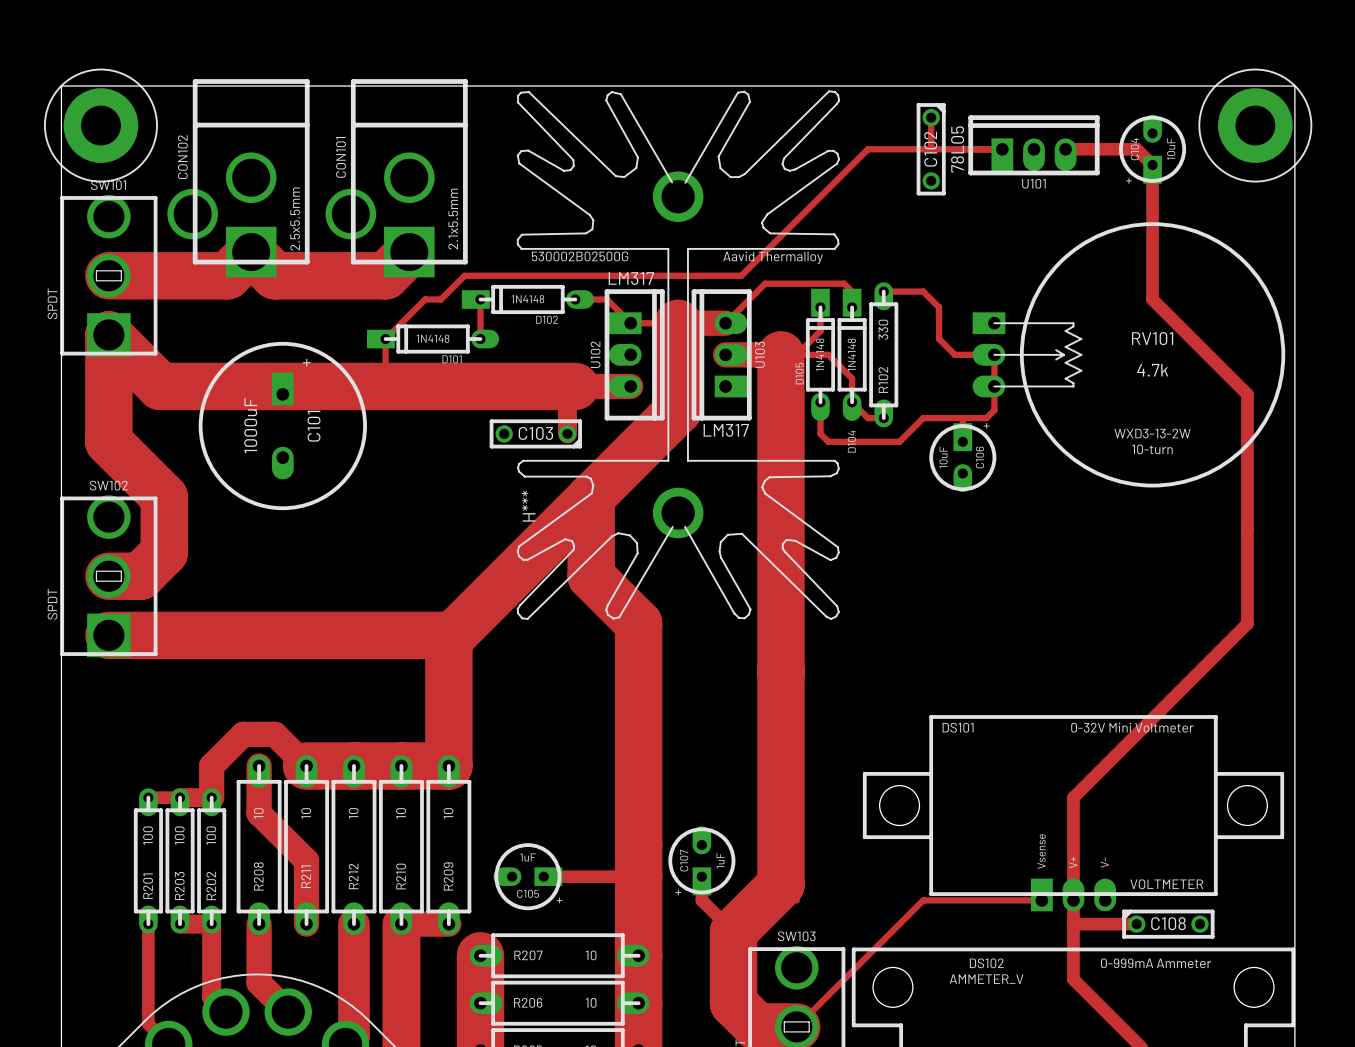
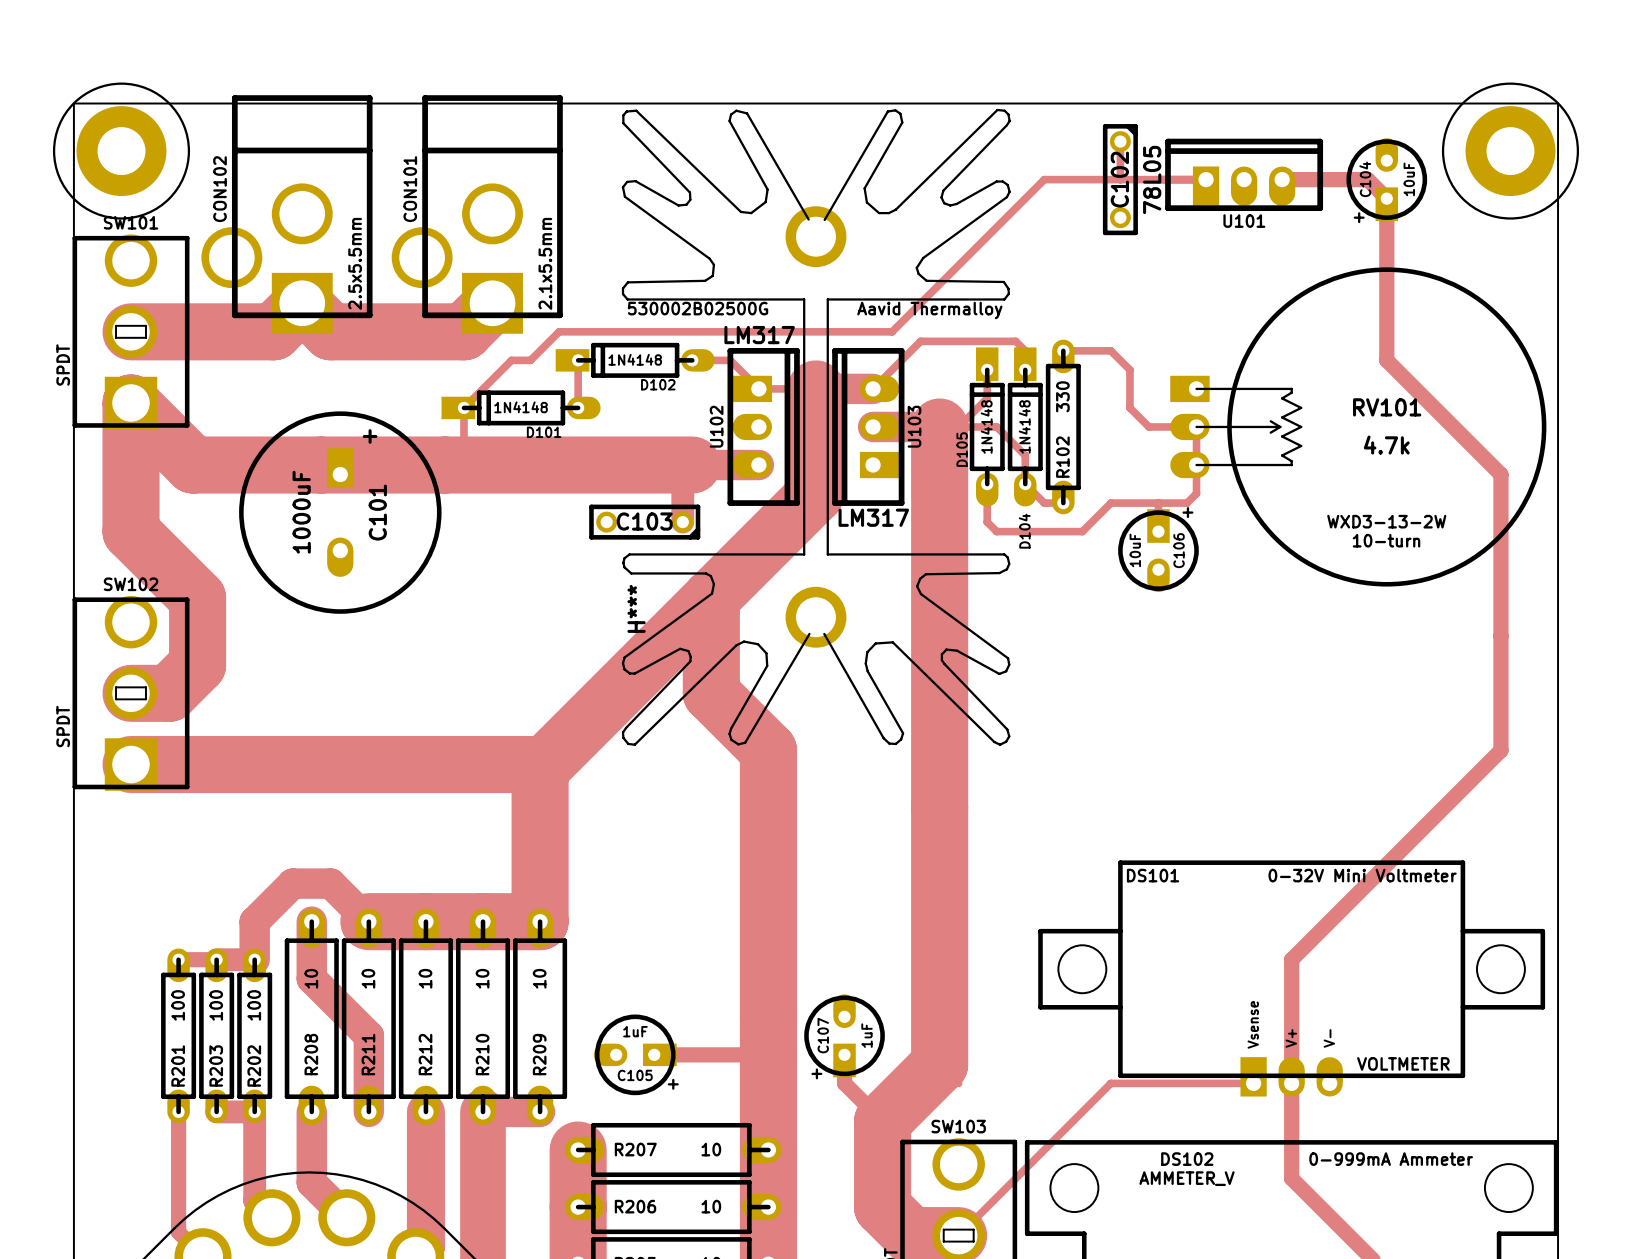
track: (1073, 924) (1136, 924) -> none
C108: (1168, 924) -> none

